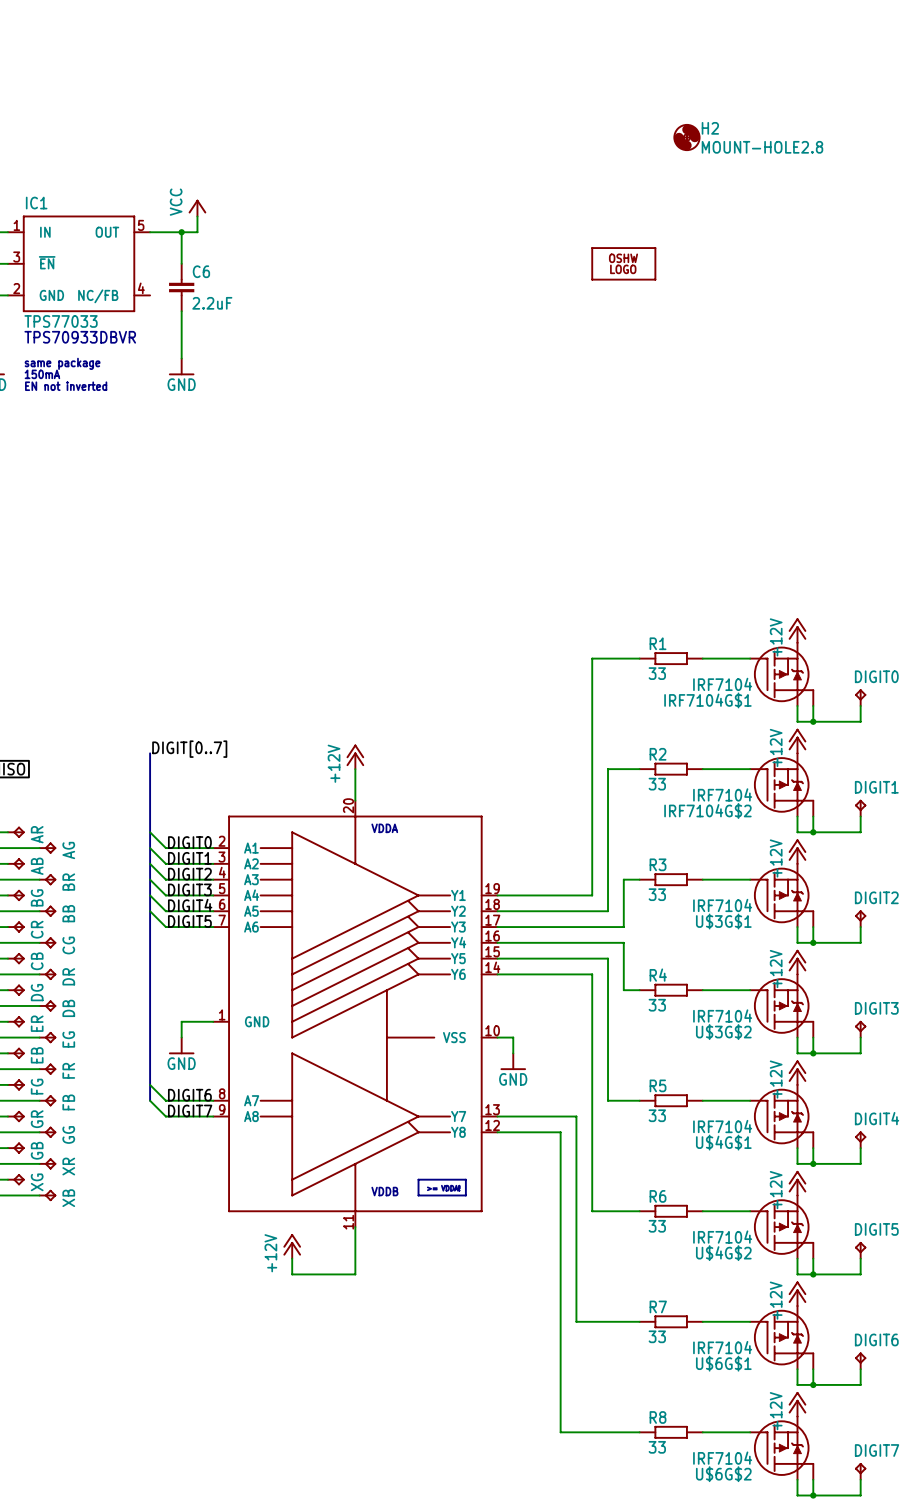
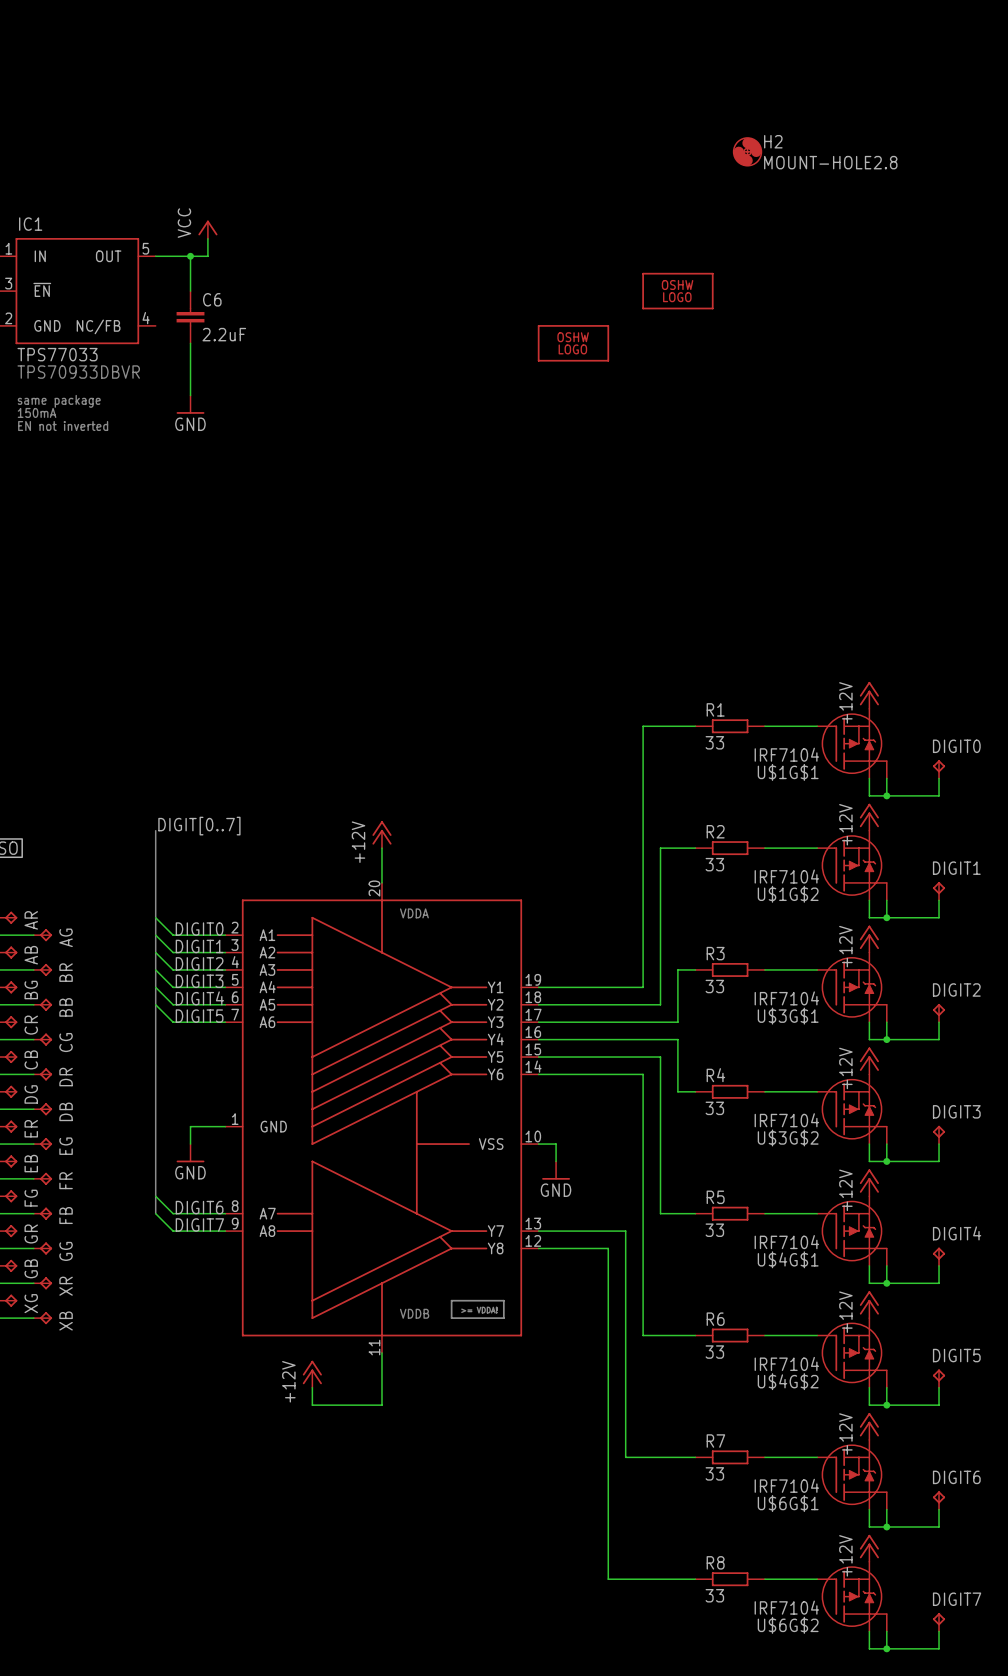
part: none -> (573, 343)
IRF7104G$1 name: IRF7104G$1 (707, 700) -> U$1G$1 (788, 772)
IRF7104G$2 name: IRF7104G$2 (707, 810) -> U$1G$2 (788, 894)

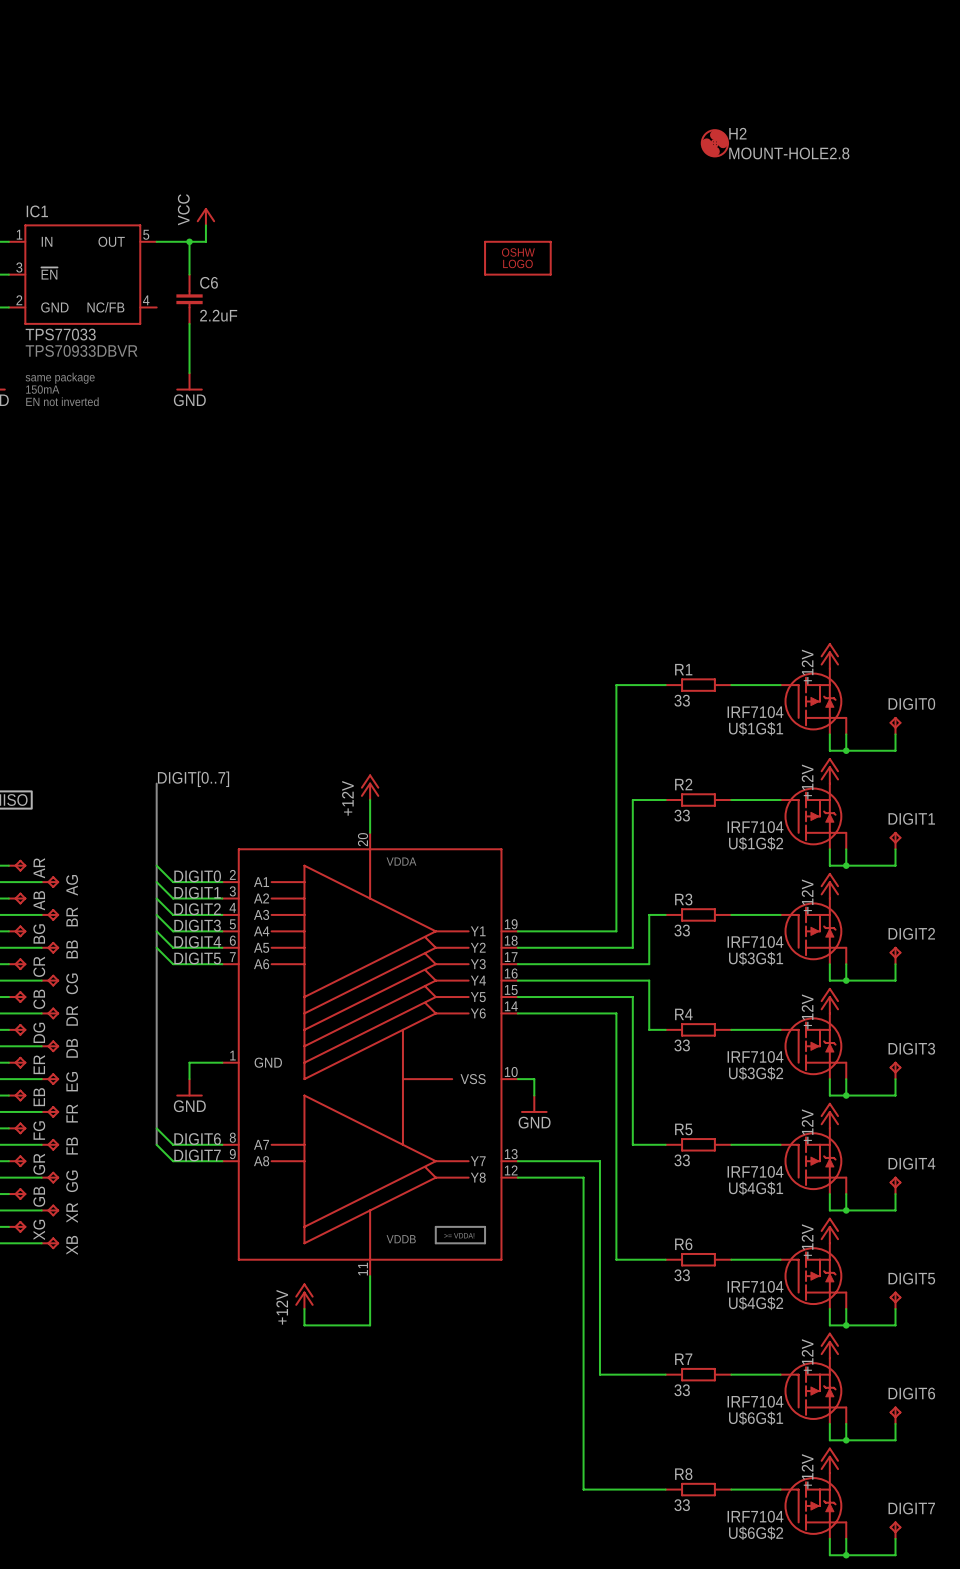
part: none -> (517, 258)
part: (677, 291) -> none
part: (573, 343) -> none

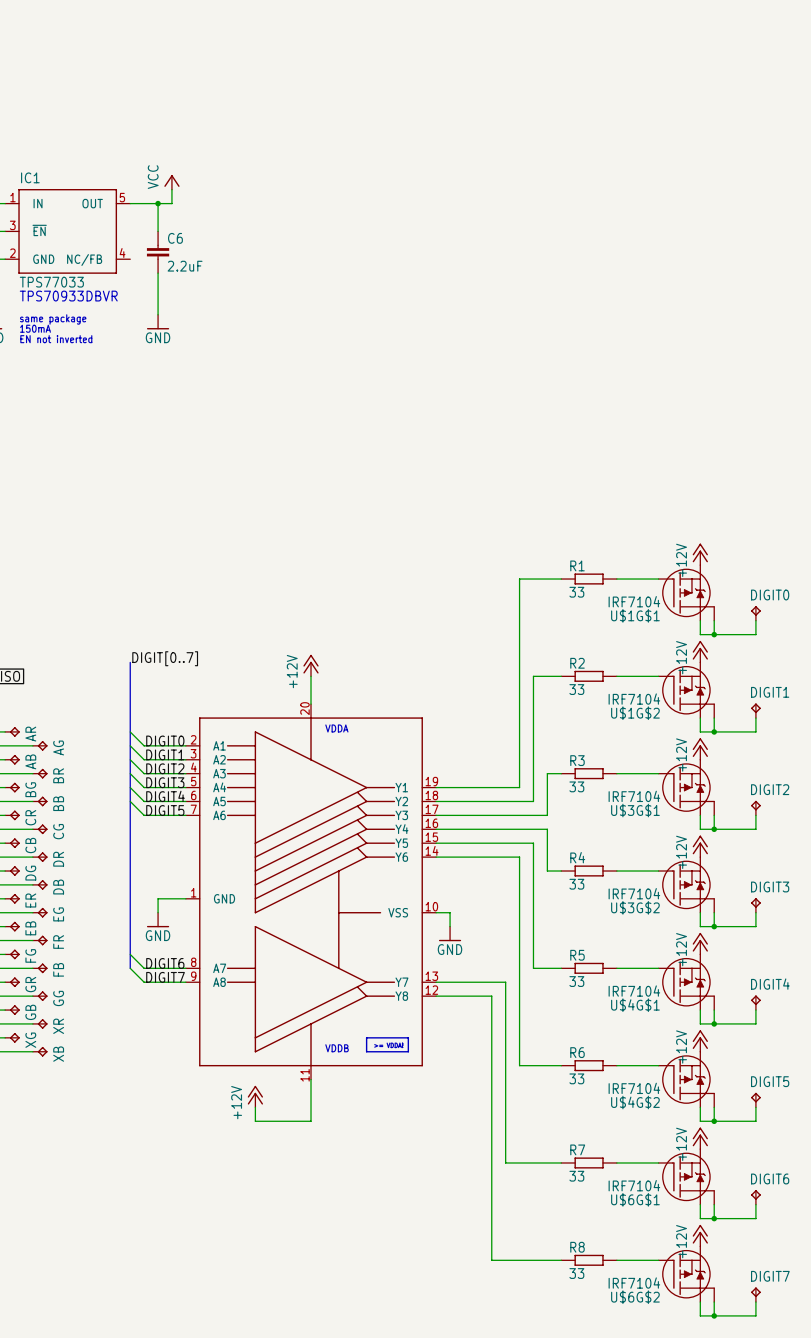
H2: MOUNT-HOLE2.8 (714, 143) -> none
part: (517, 258) -> none

